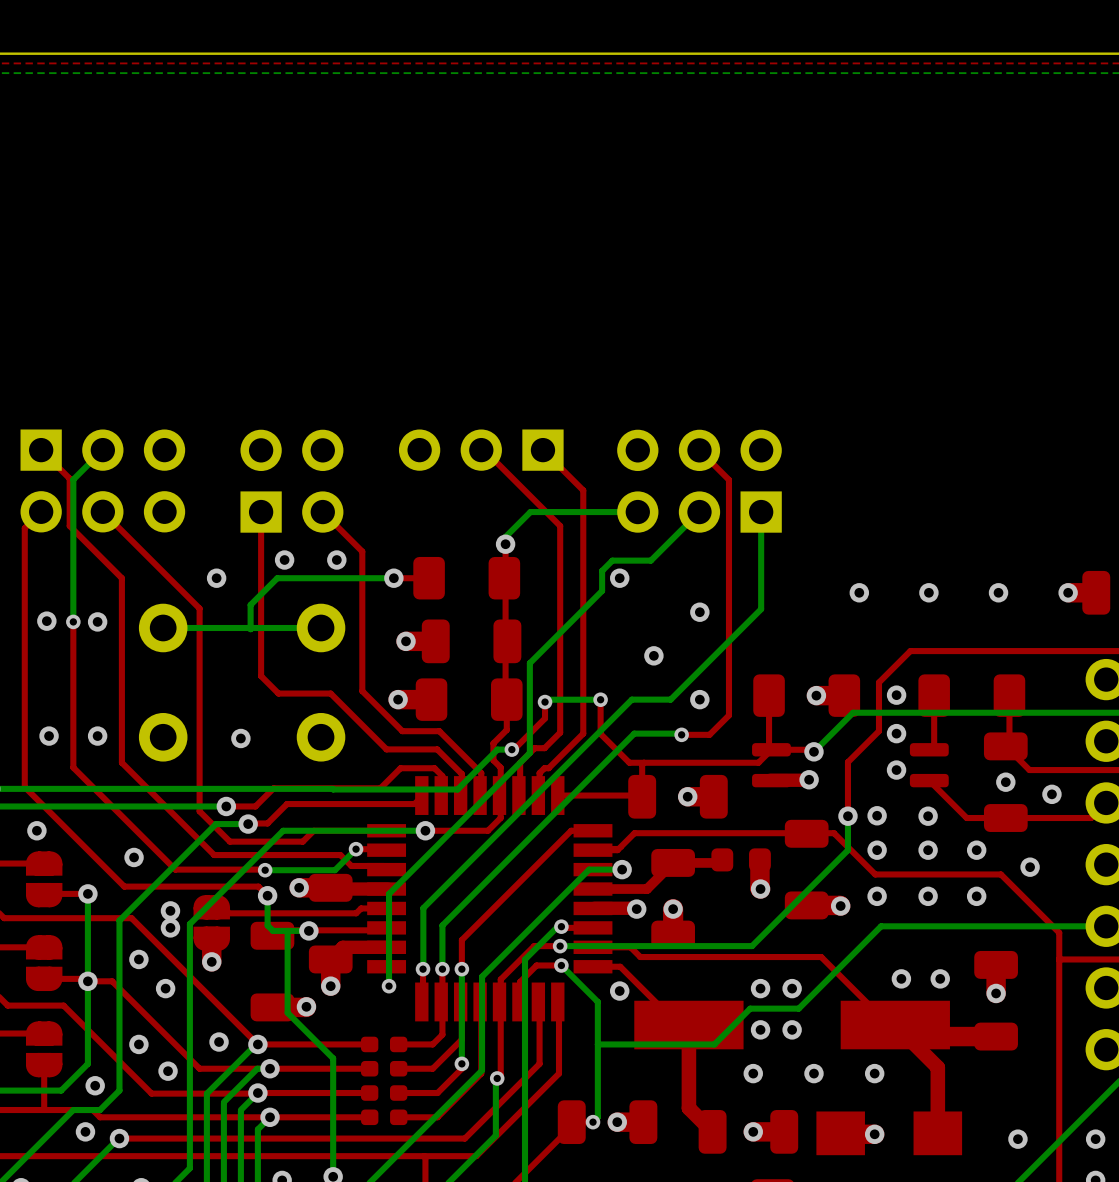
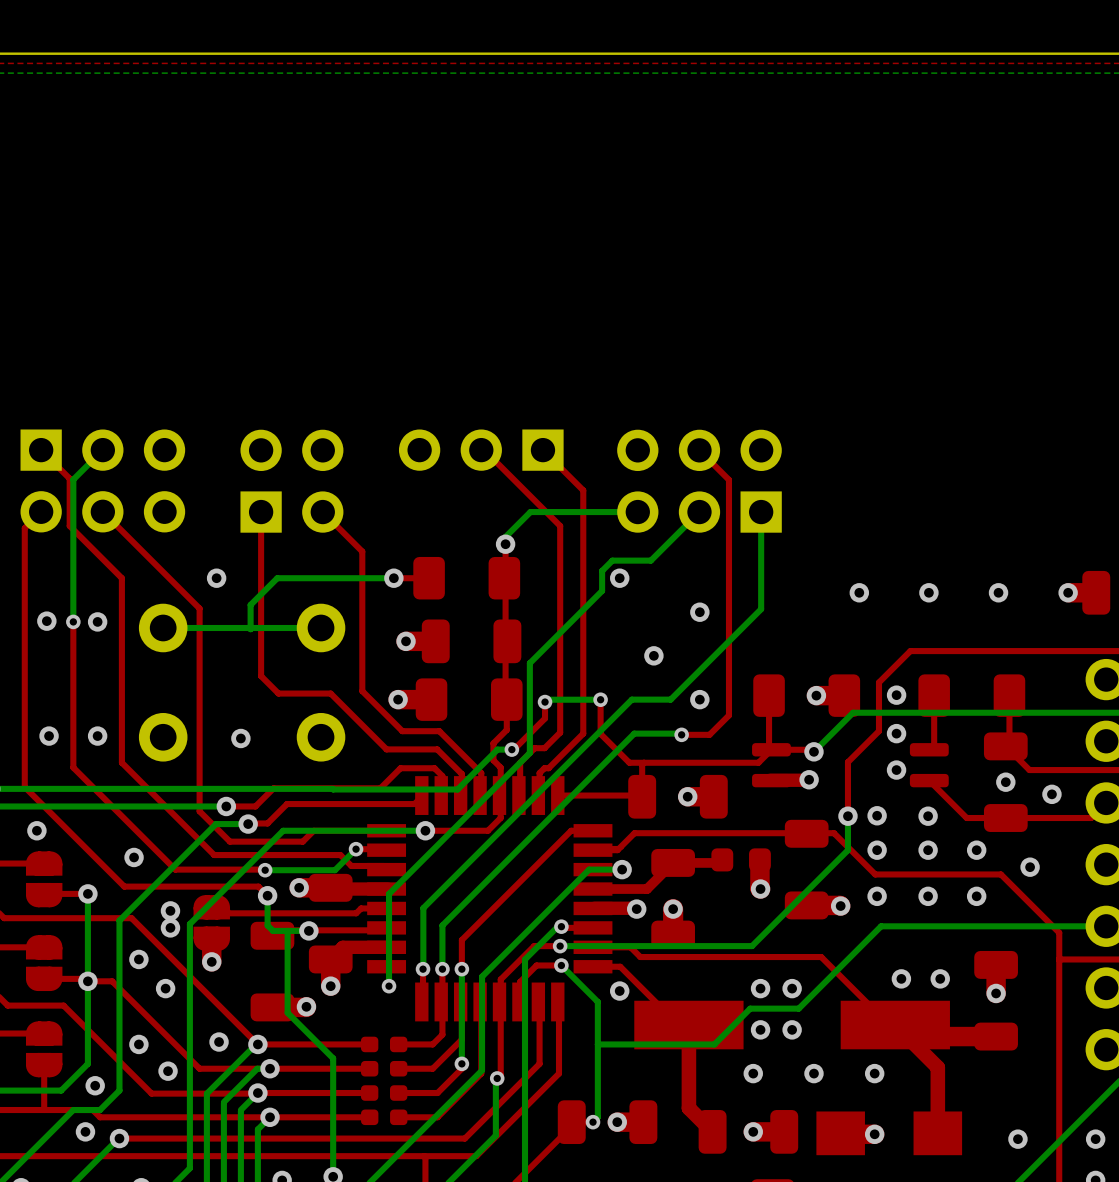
via: (284, 560) -> none
via: (336, 560) -> none

